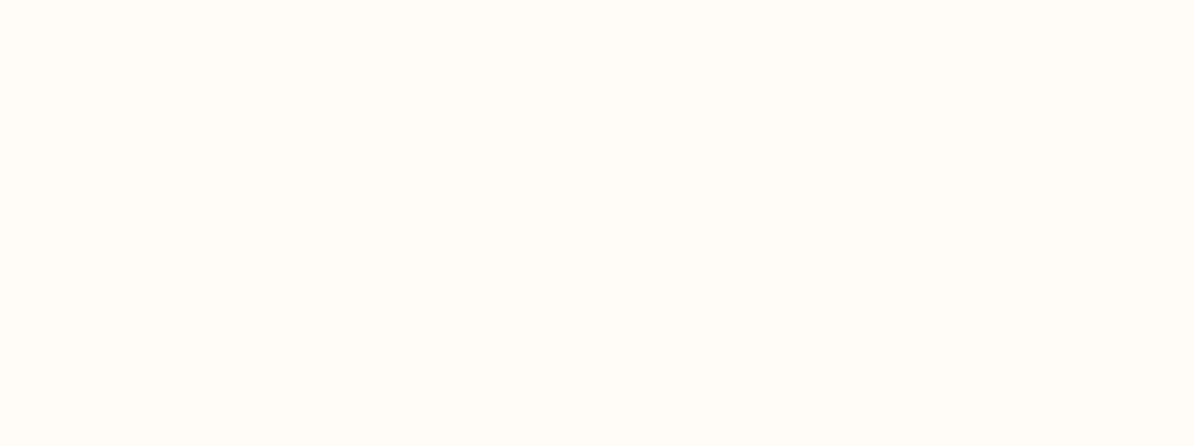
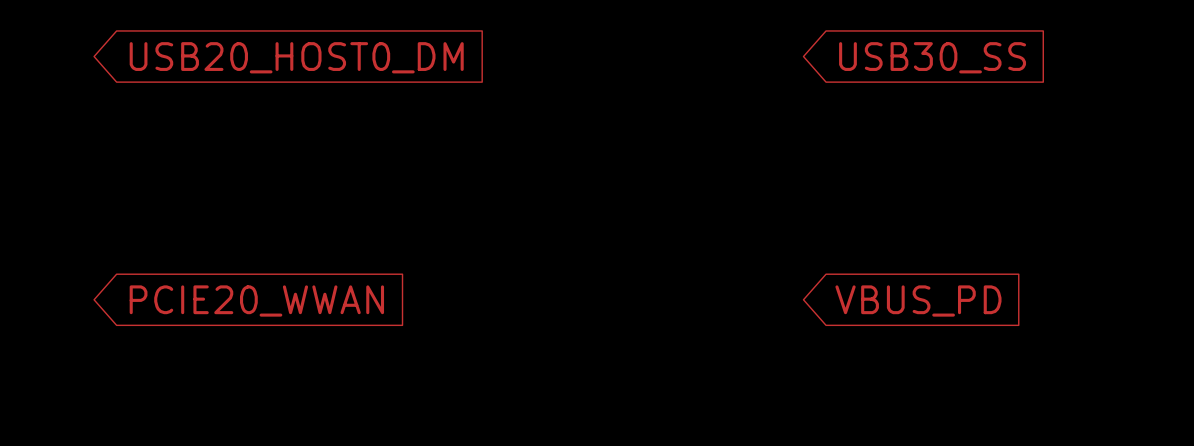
global label: none -> USB20_HOST0_DM (296, 57)
global label: none -> USB30_SS (932, 57)
global label: none -> PCIE20_WWAN (256, 301)
global label: none -> VBUS_PD (918, 301)

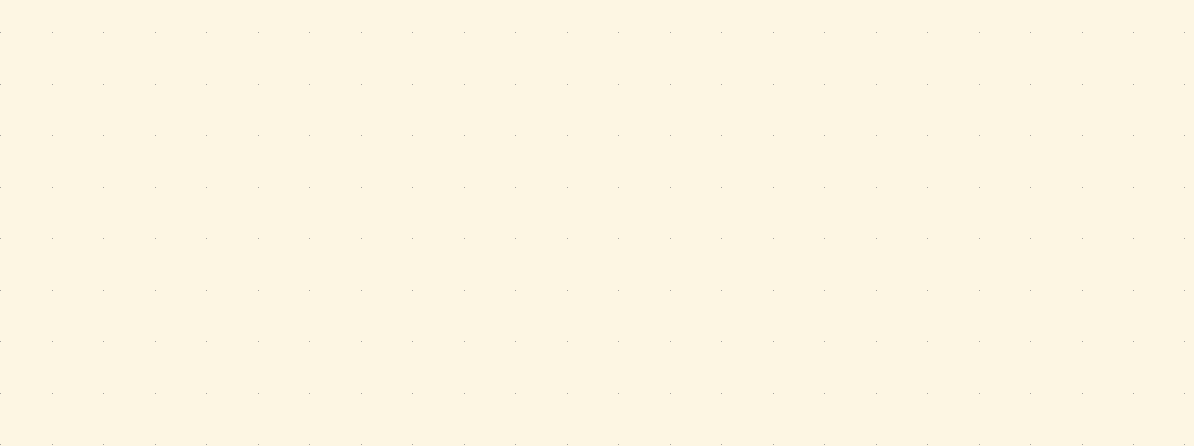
global label: USB20_HOST0_DM (296, 57) -> none
global label: USB30_SS (932, 57) -> none
global label: PCIE20_WWAN (256, 301) -> none
global label: VBUS_PD (918, 301) -> none

